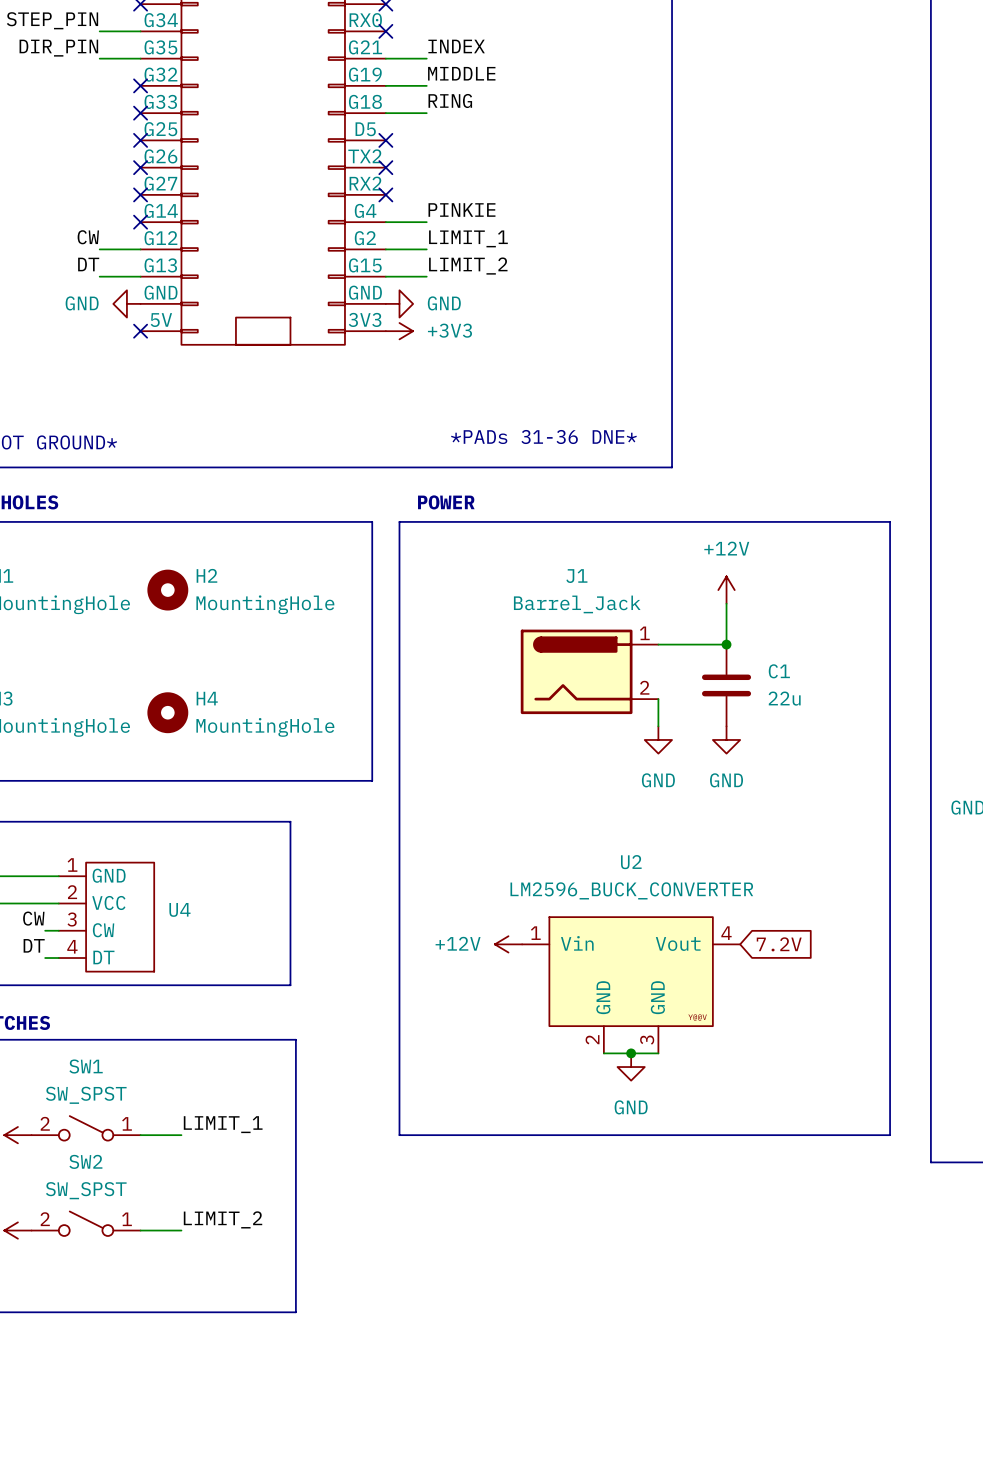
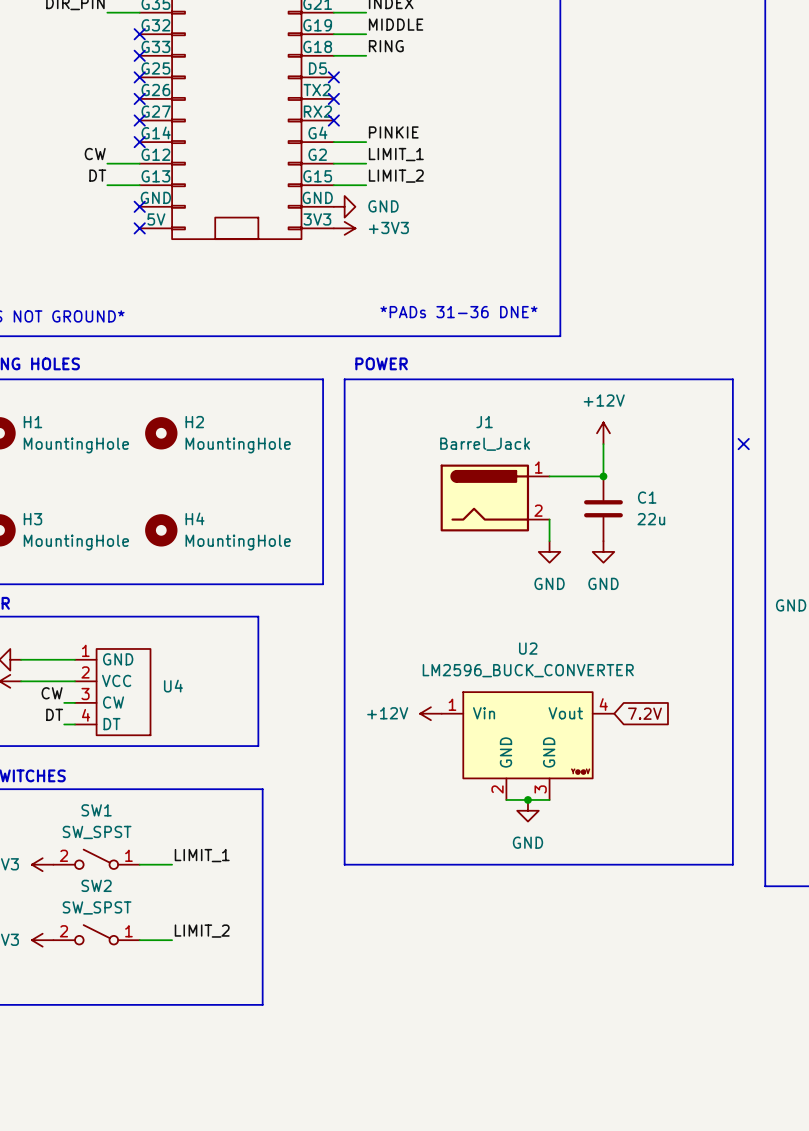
power symbol: GND (126, 303) -> none
no-connect mark: none -> (139, 206)
no-connect mark: none -> (743, 444)

